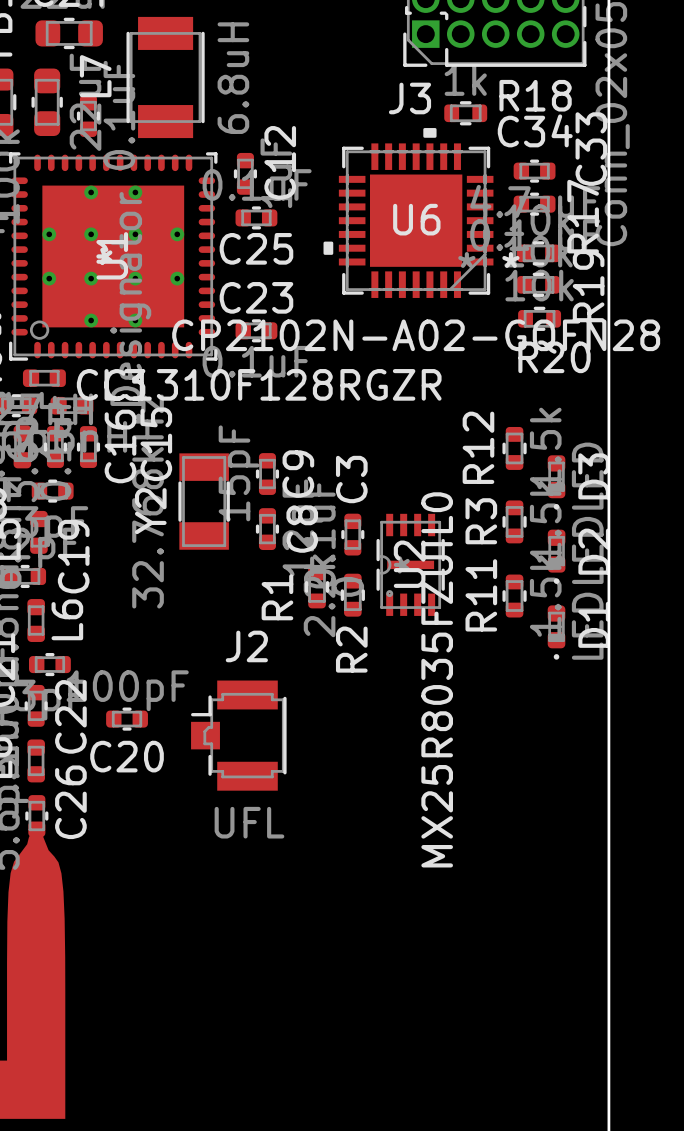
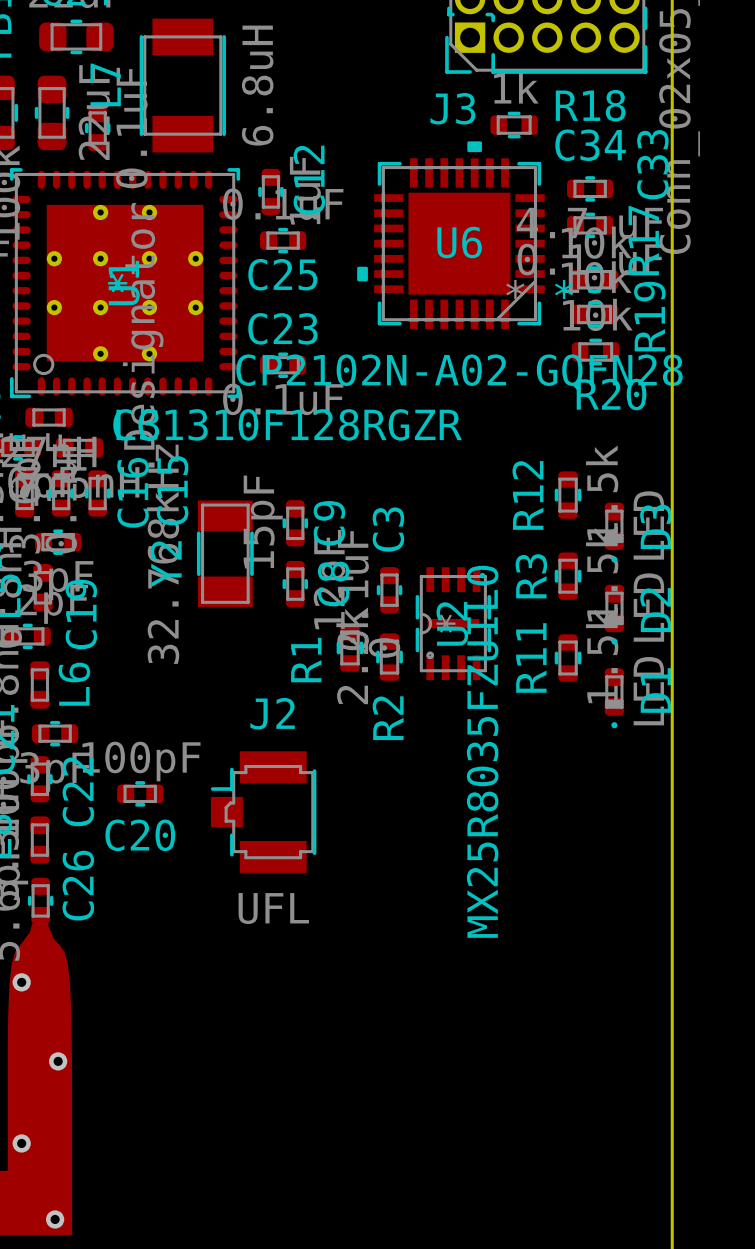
via: none -> (21, 982)
via: none -> (58, 1061)
via: none -> (21, 1143)
via: none -> (55, 1219)

